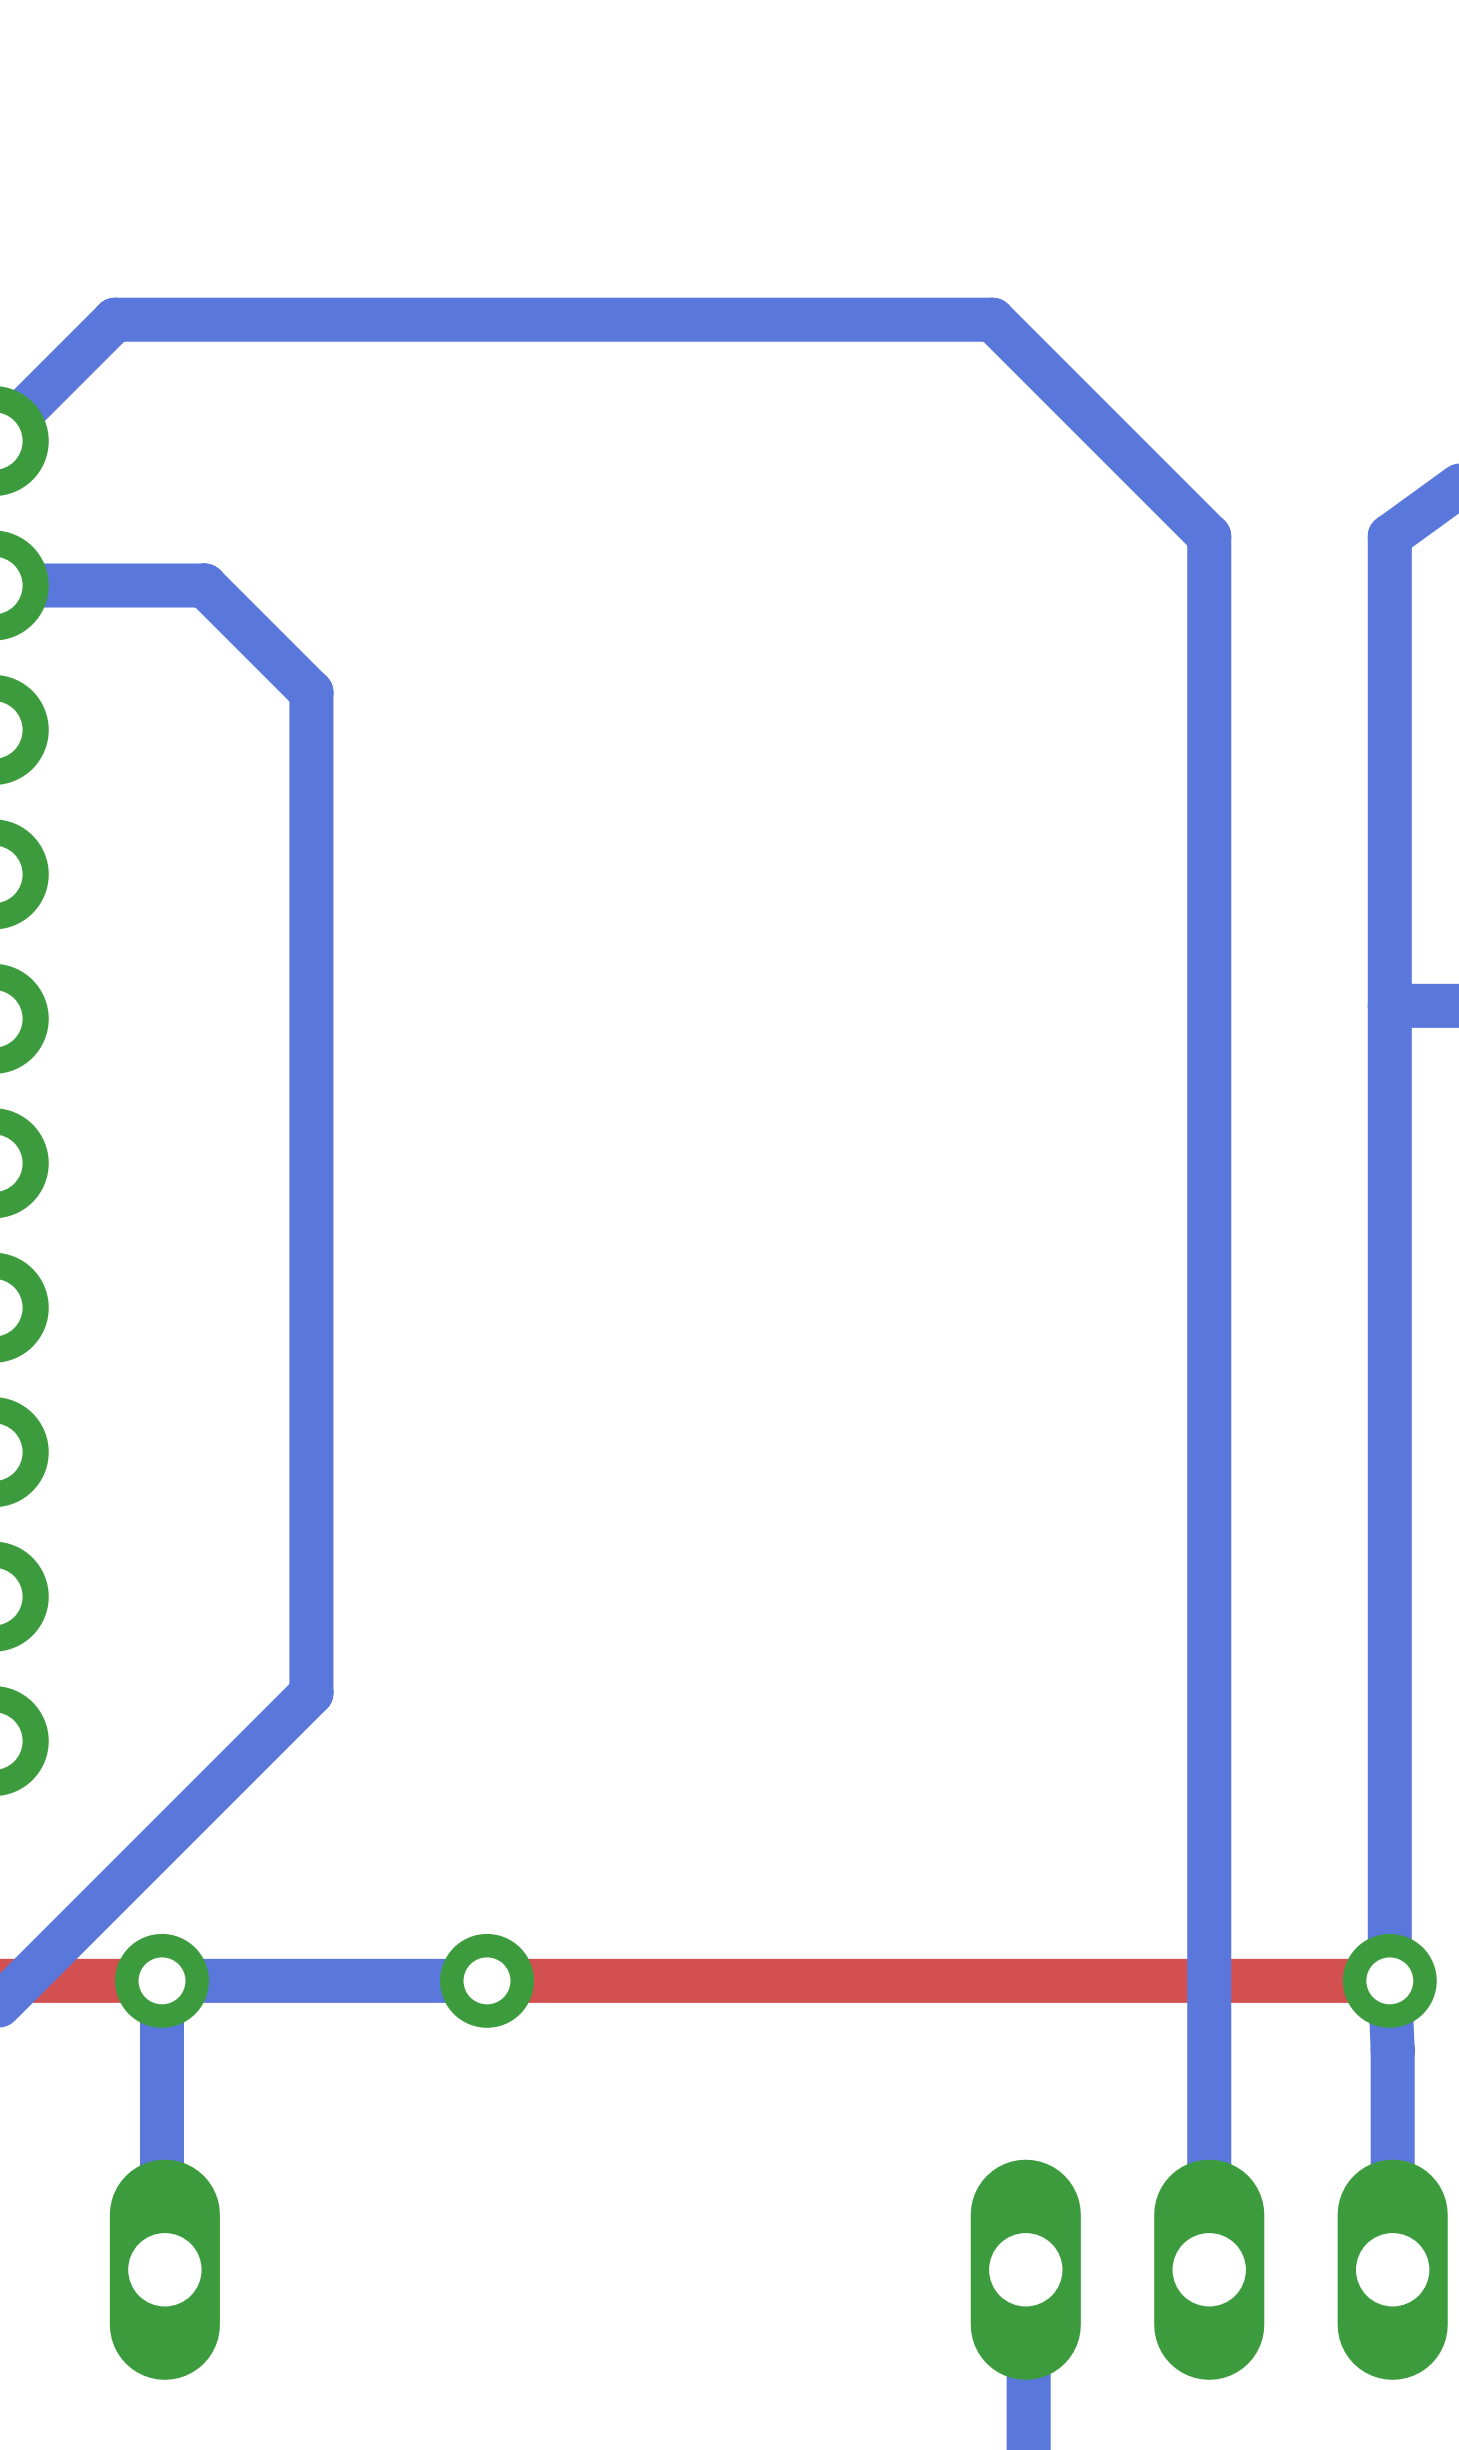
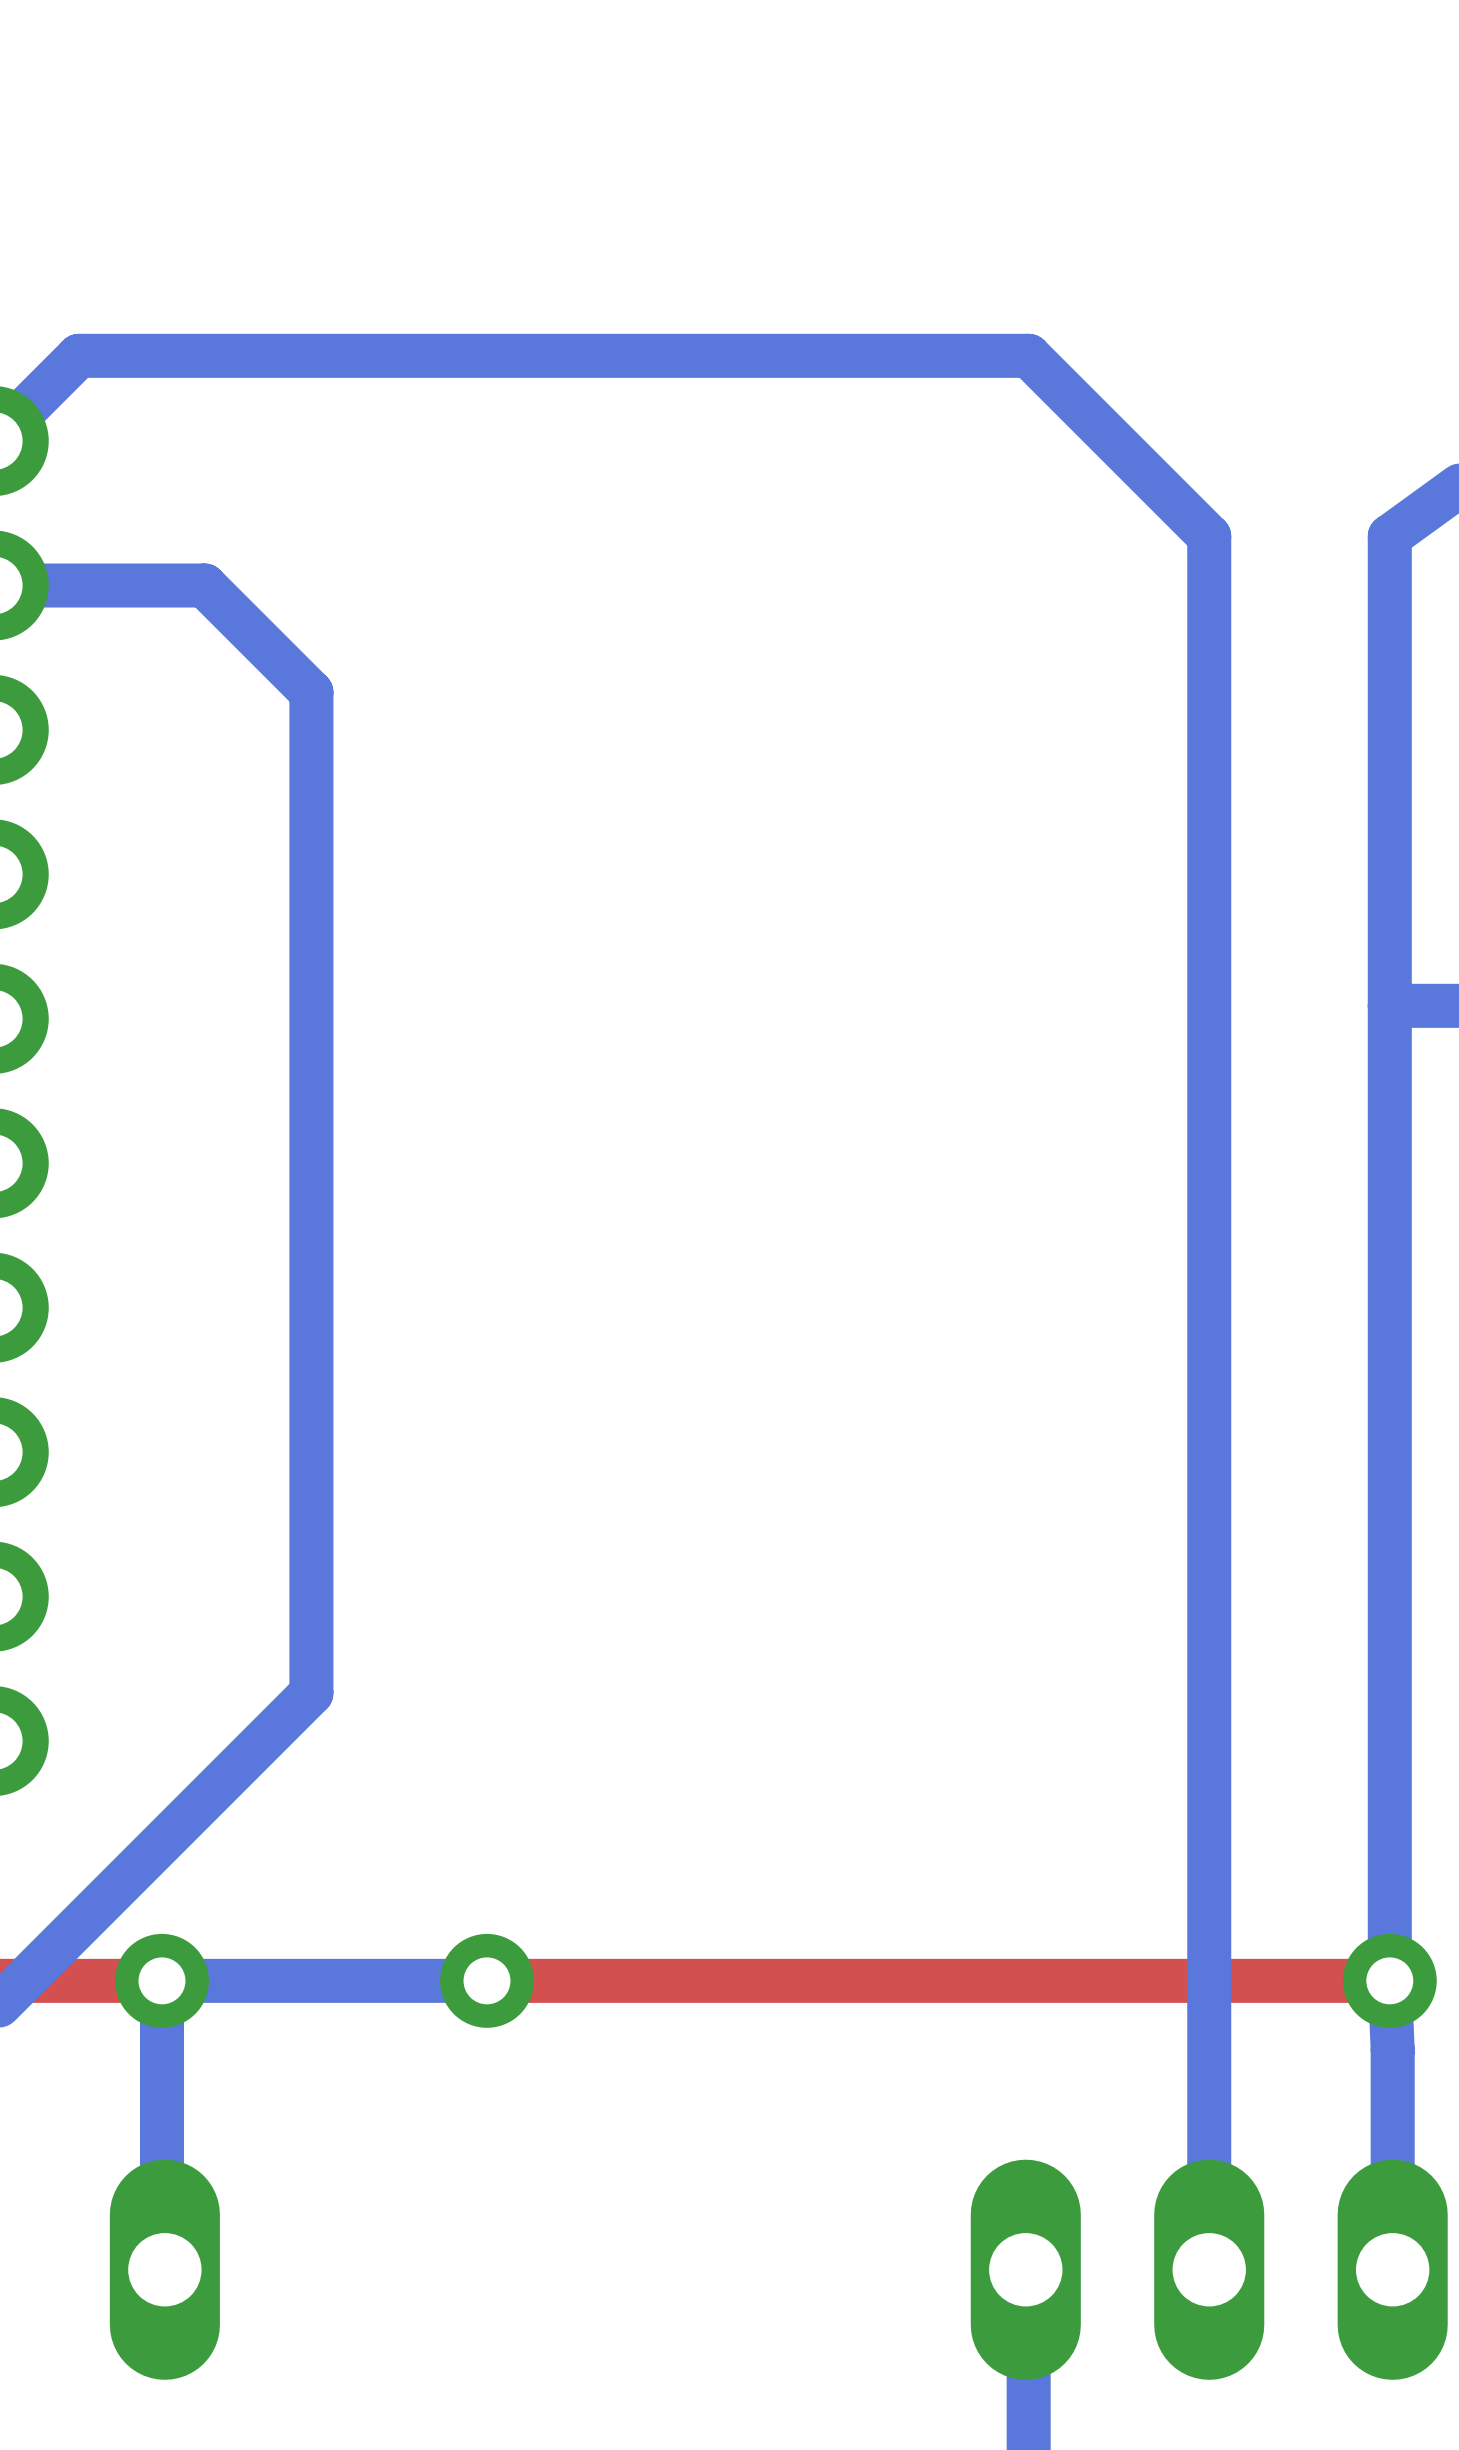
bottom track: (1028, 355) (992, 319) (115, 319) (78, 355) -> (1028, 355) (78, 355)

